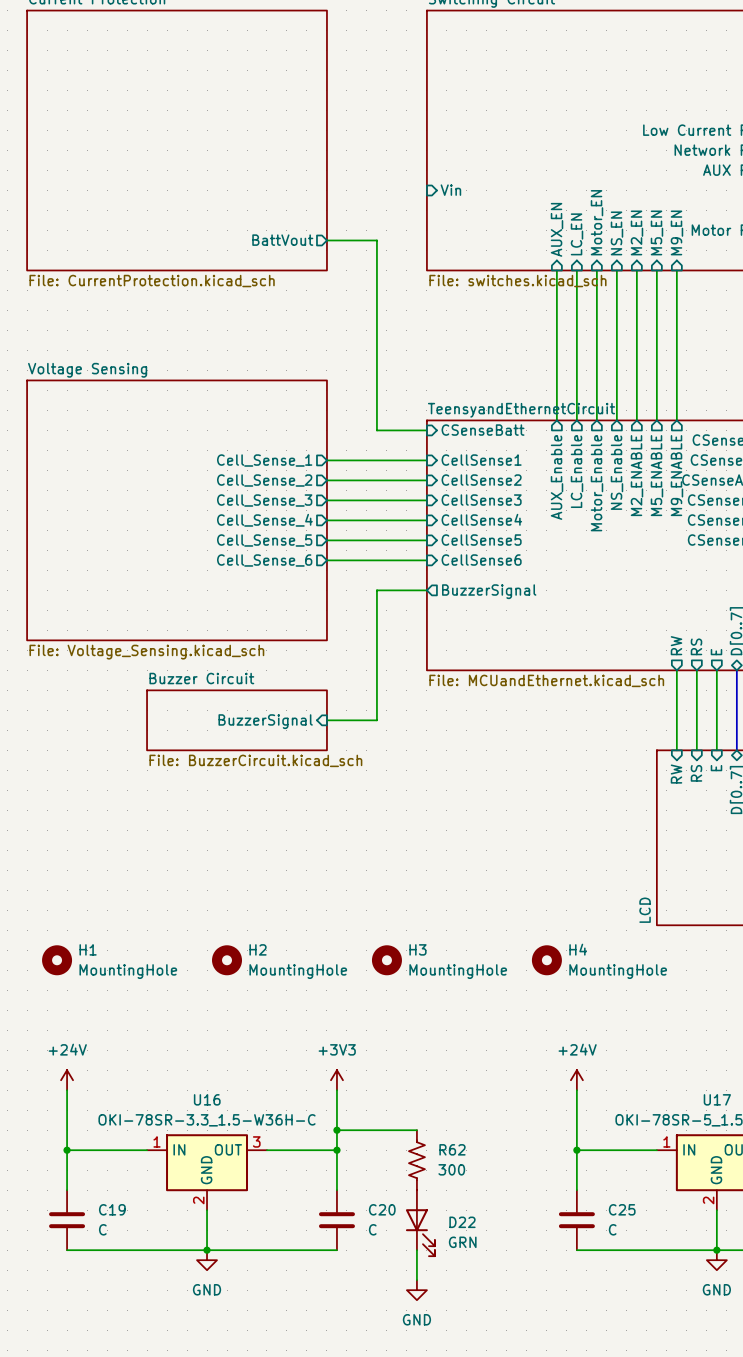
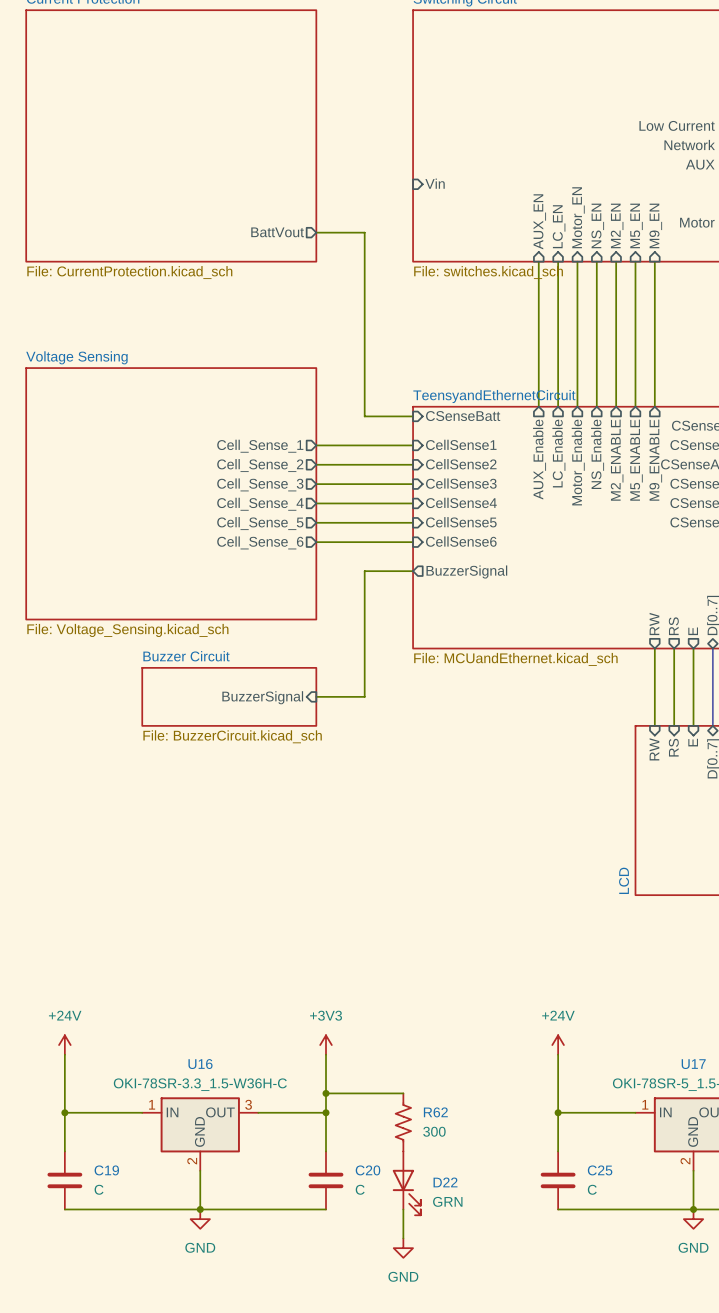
H1: MountingHole (57, 960) -> none
H2: MountingHole (227, 960) -> none
H3: MountingHole (386, 960) -> none
H4: MountingHole (546, 960) -> none

